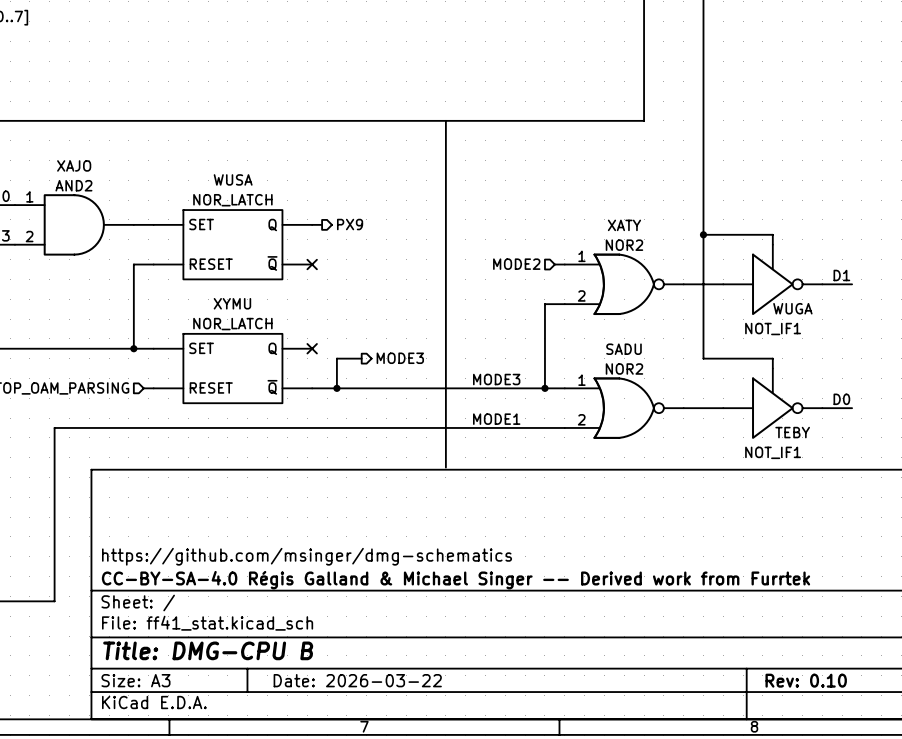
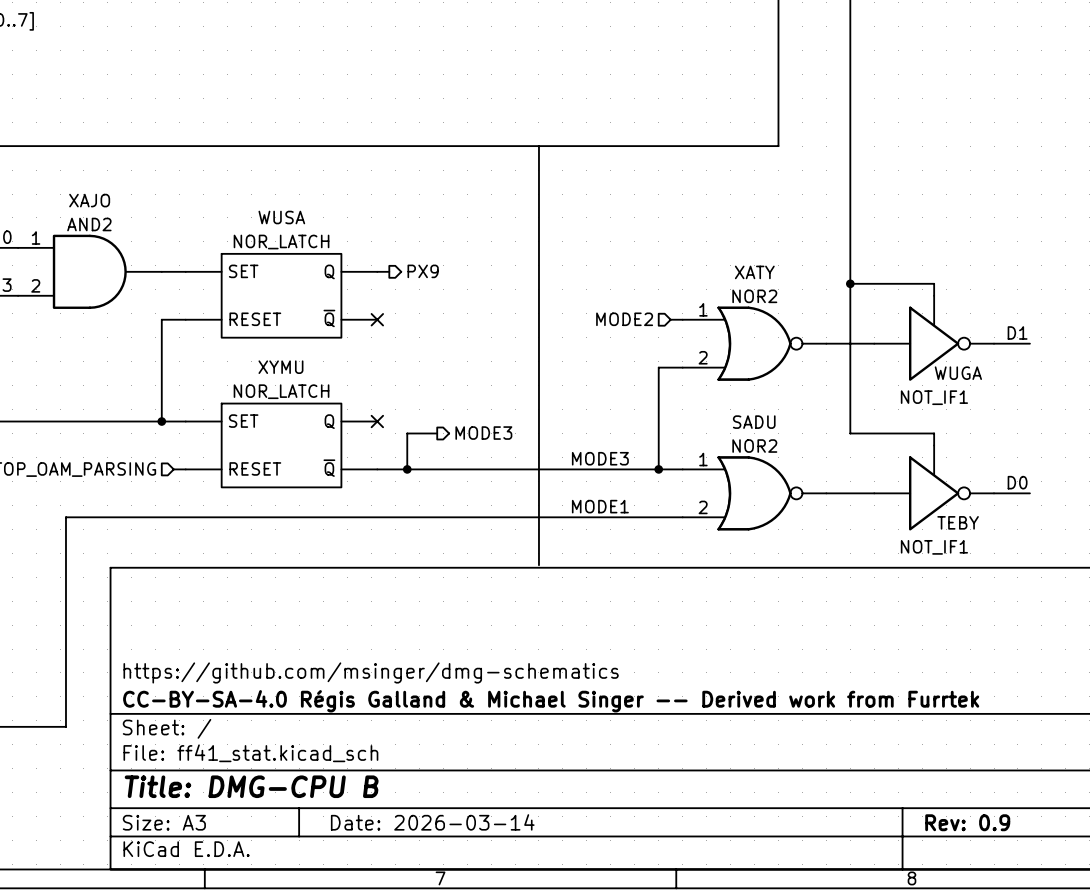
title block: Date: 2026-03-22 (357, 680) -> Date: 2026-03-14 (432, 822)
title block: Rev: 0.10 (806, 680) -> Rev: 0.9 (967, 822)

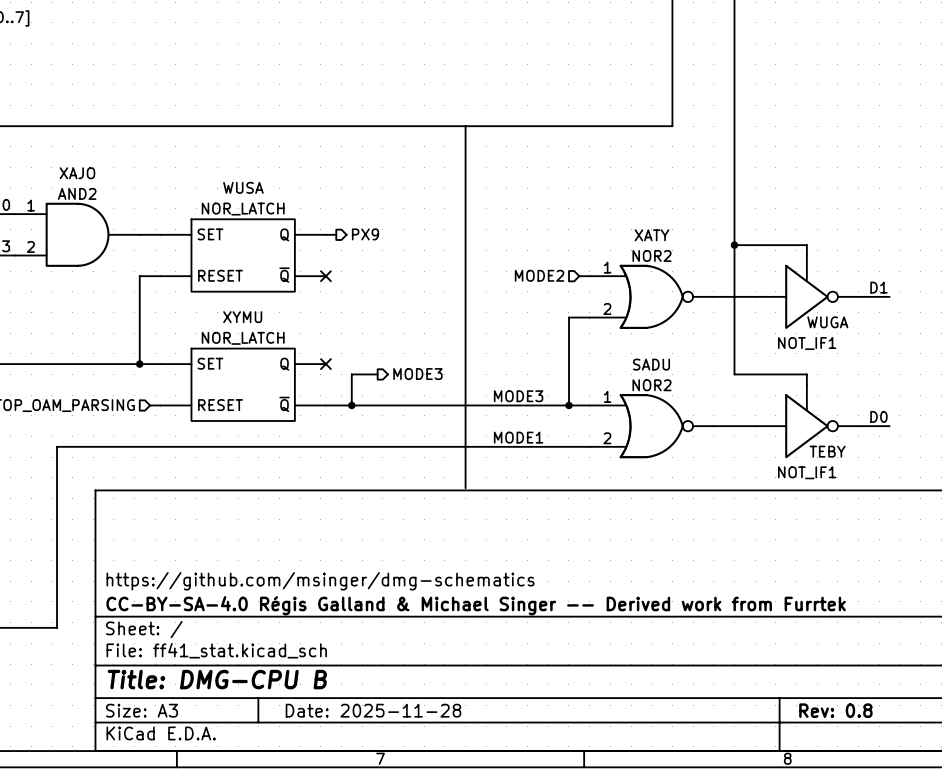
title block: Date: 2026-03-14 (432, 822) -> Date: 2025-11-28 (373, 710)
title block: Rev: 0.9 (967, 822) -> Rev: 0.8 (835, 710)

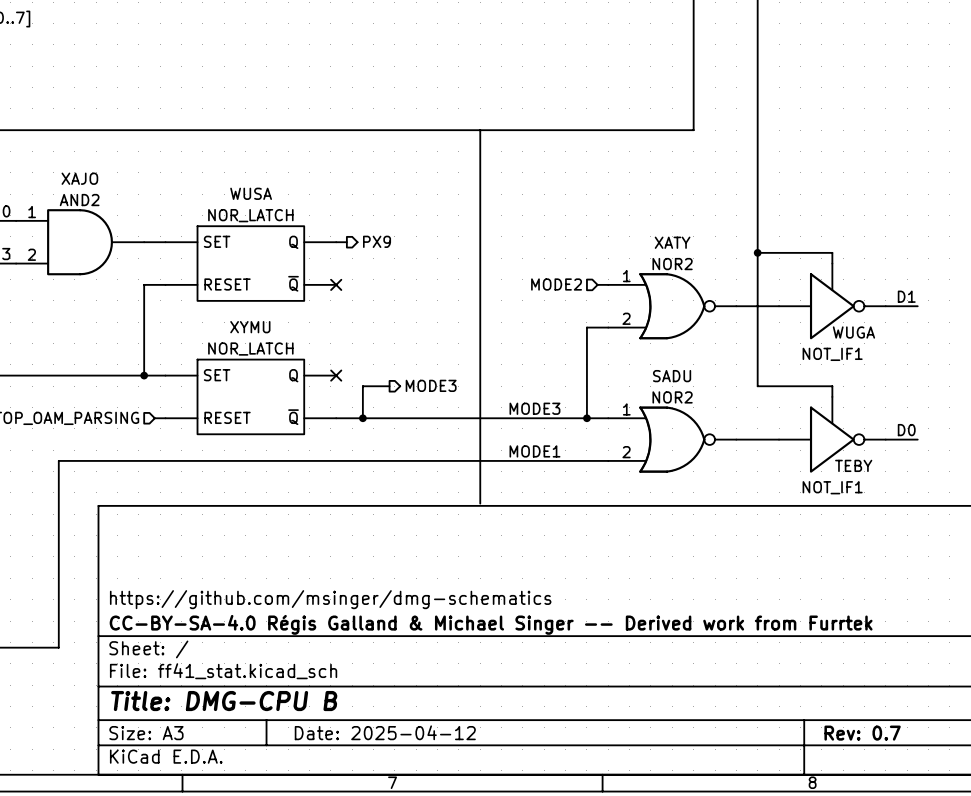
title block: Date: 2025-11-28 (373, 710) -> Date: 2025-04-12 (385, 732)
title block: Rev: 0.8 (835, 710) -> Rev: 0.7 (862, 733)

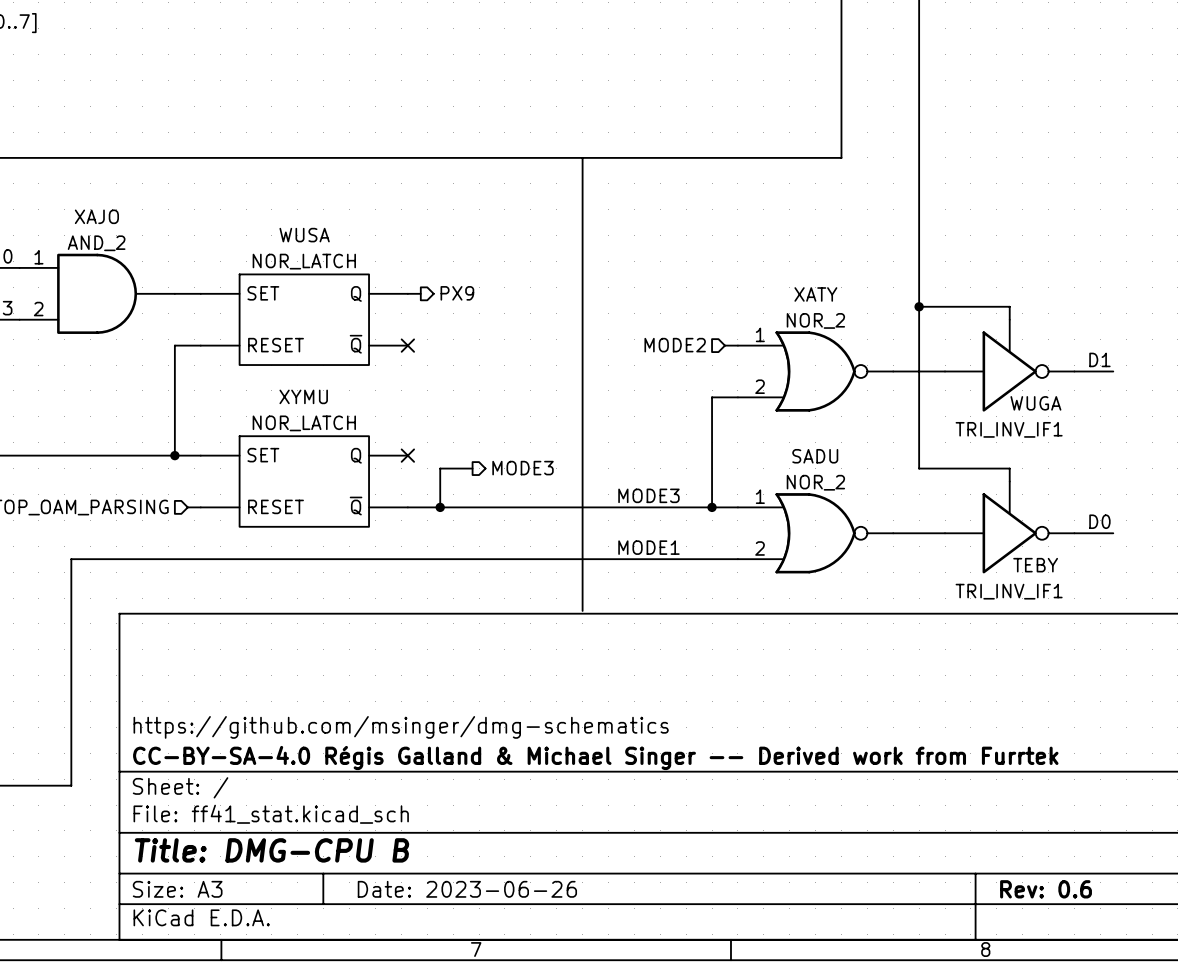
XAJO value: AND2 (79, 200) -> AND_2 (96, 243)
XATY value: NOR2 (672, 264) -> NOR_2 (815, 320)
WUGA value: NOT_IF1 (832, 354) -> TRI_INV_IF1 (1009, 429)
SADU value: NOR2 (672, 397) -> NOR_2 (815, 482)
TEBY value: NOT_IF1 (832, 487) -> TRI_INV_IF1 (1009, 591)
title block: Date: 2025-04-12 (385, 732) -> Date: 2023-06-26 (467, 889)
title block: Rev: 0.7 (862, 733) -> Rev: 0.6 (1046, 889)

